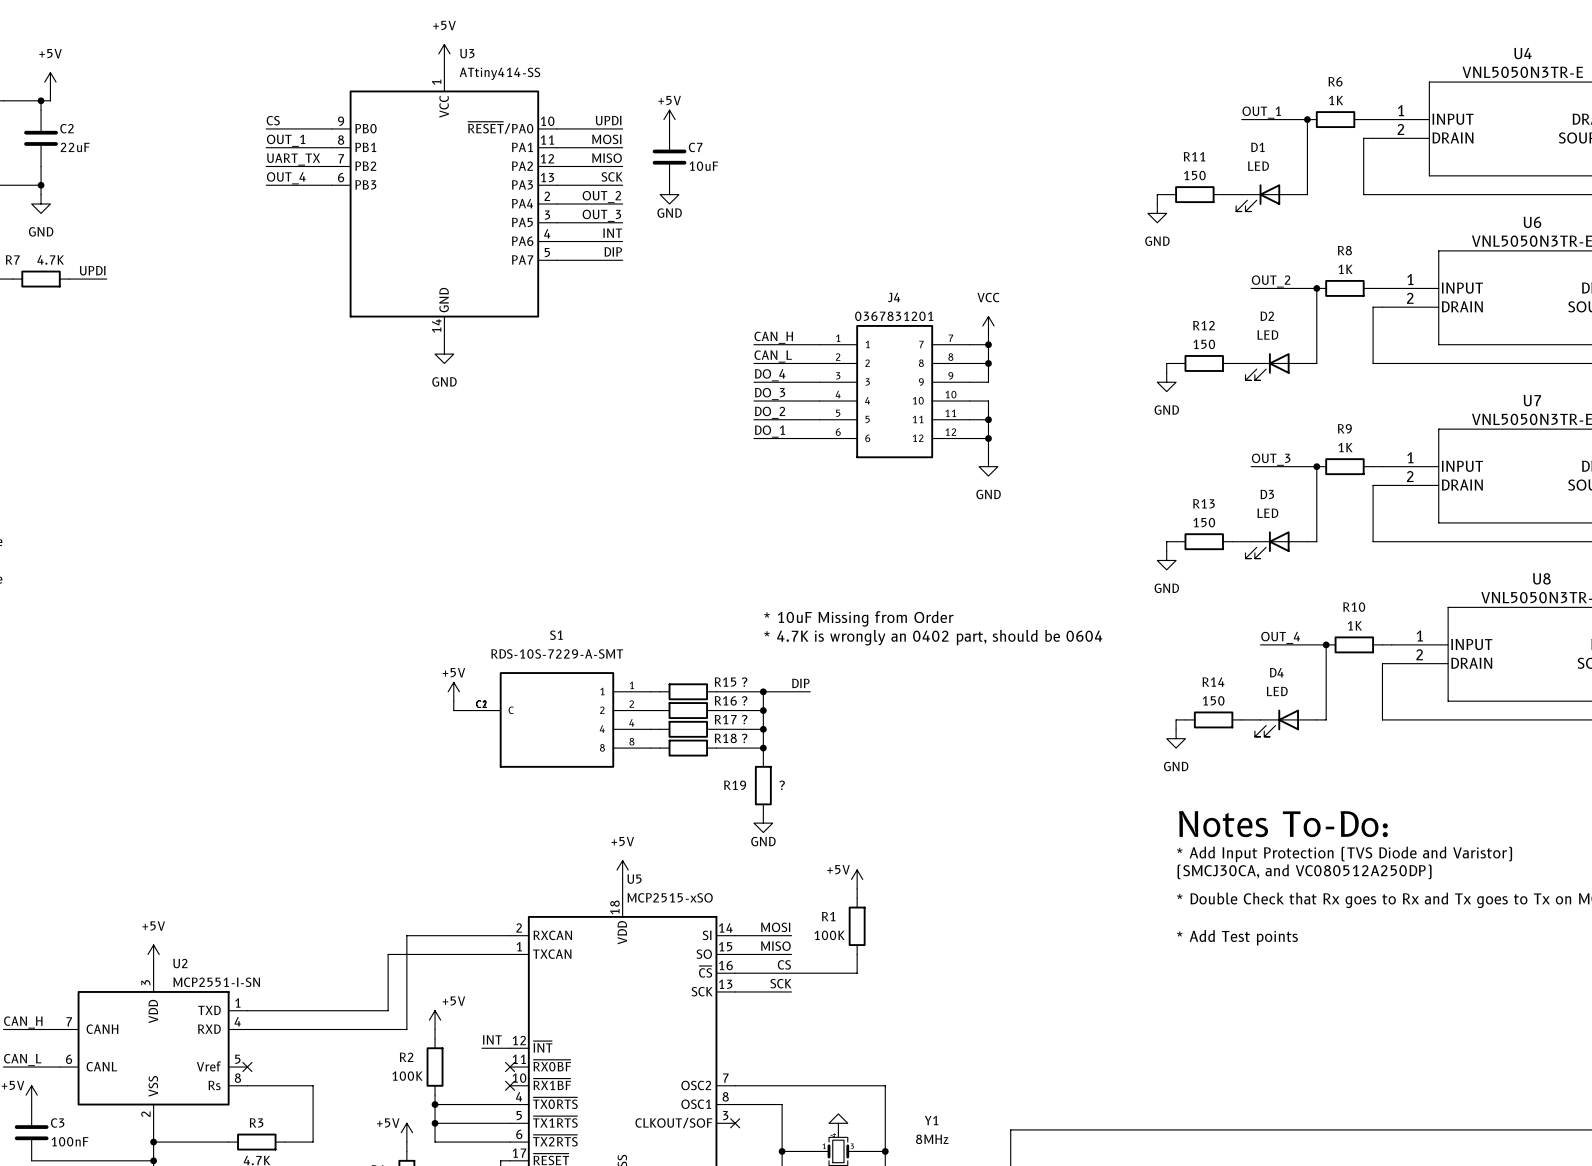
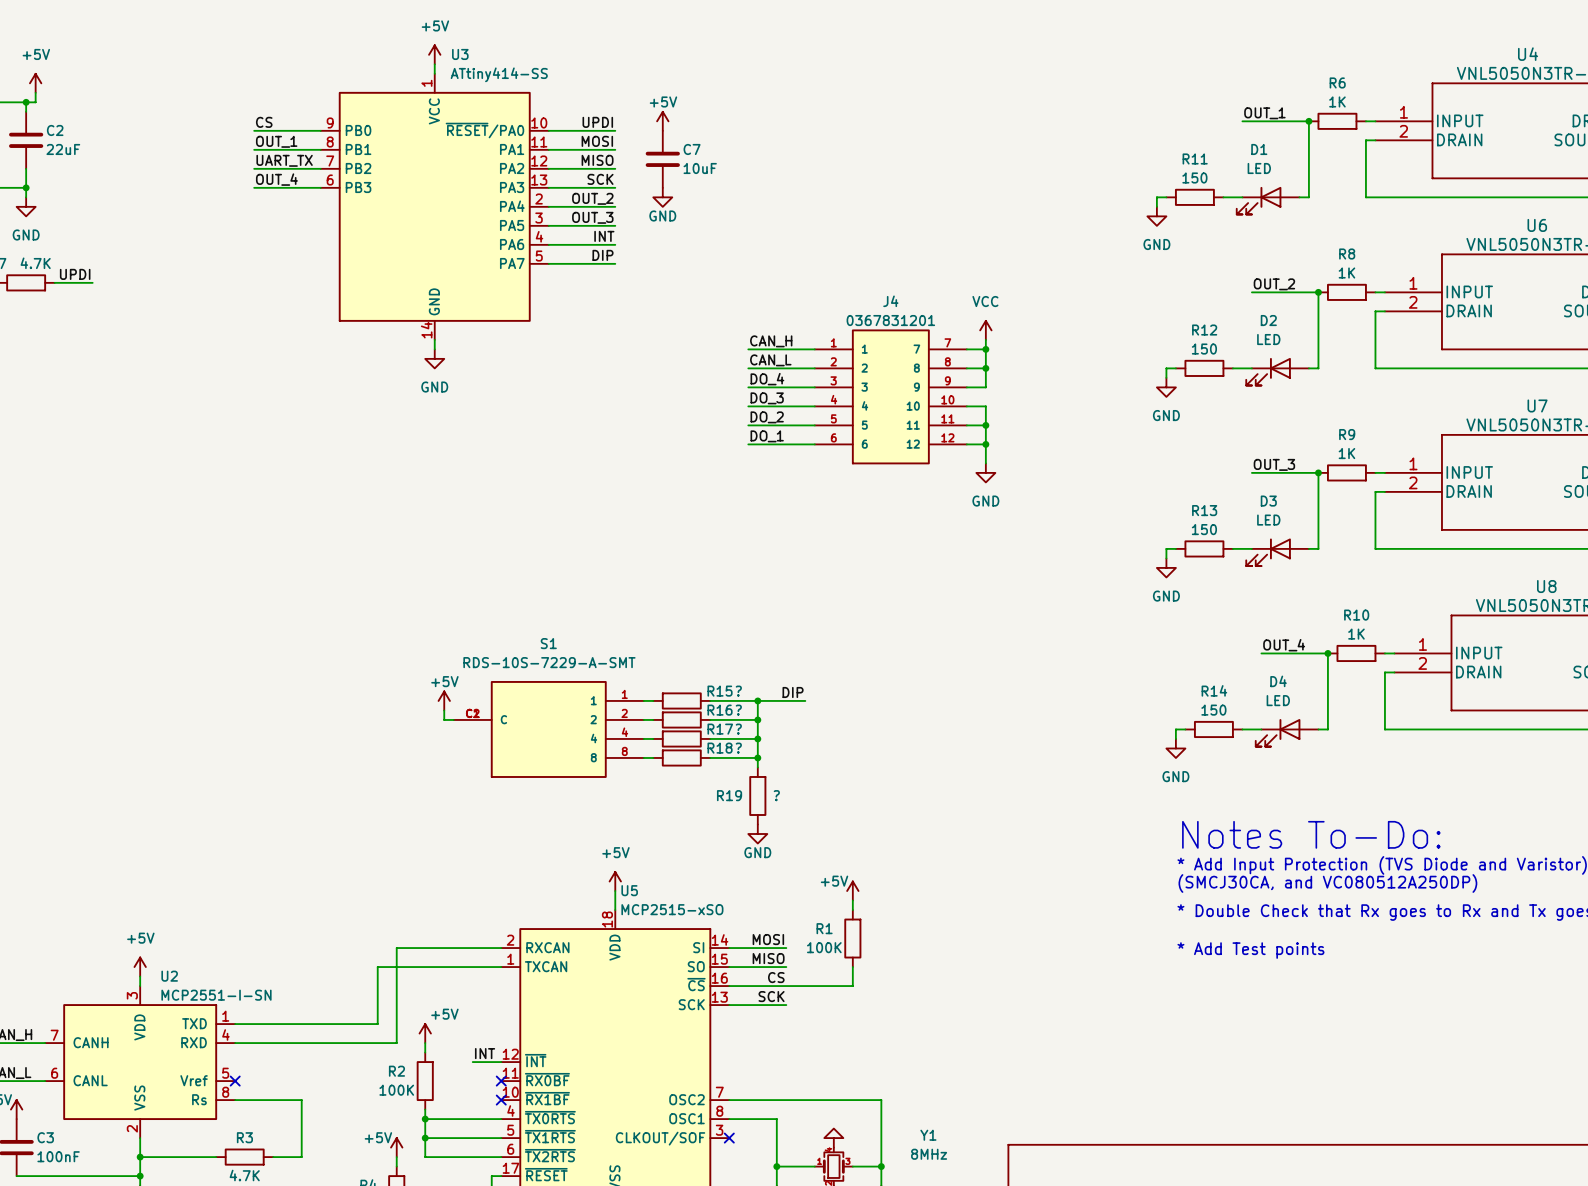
text: * 10uF Missing from Order (858, 618) -> none
text: * 4.7K is wrongly an 0402 part, should be 0604 (933, 637) -> none

